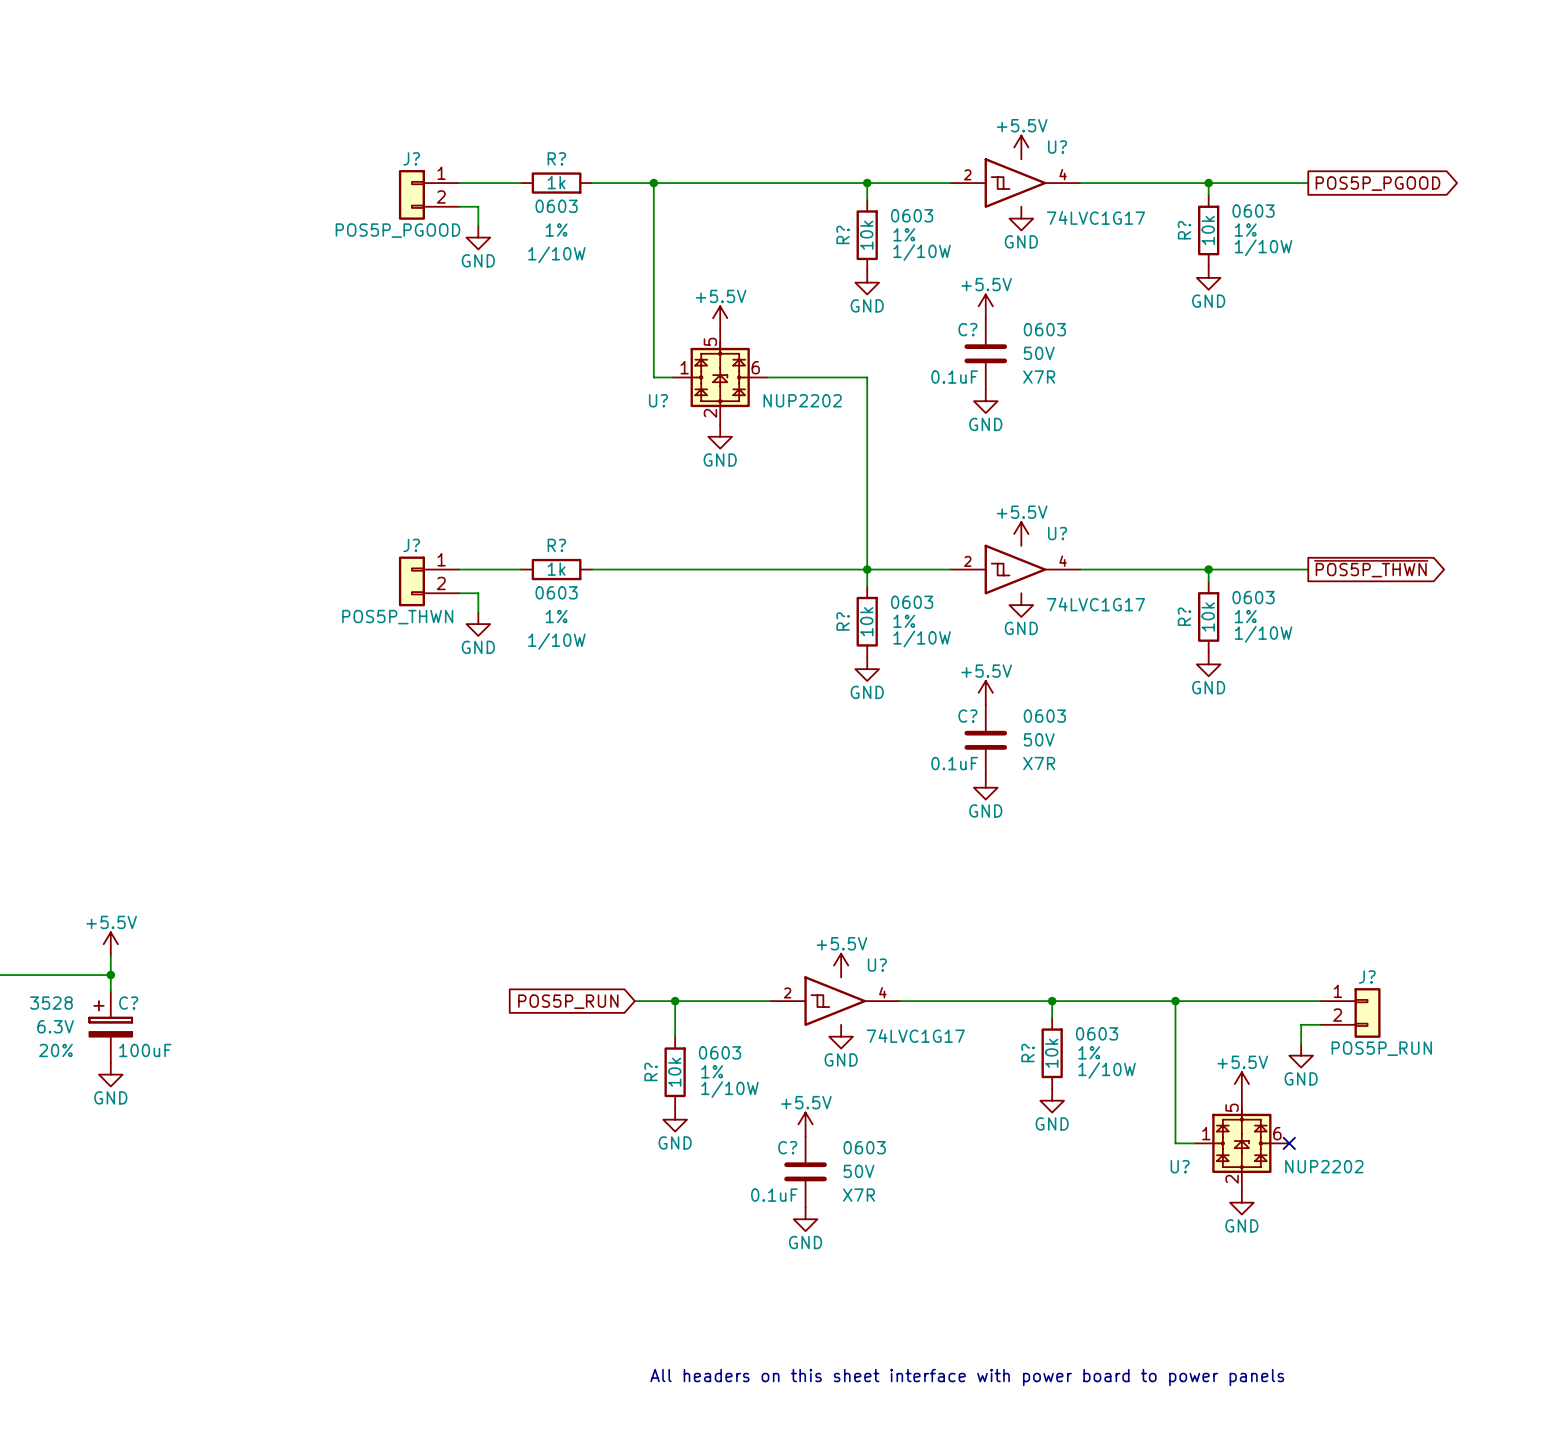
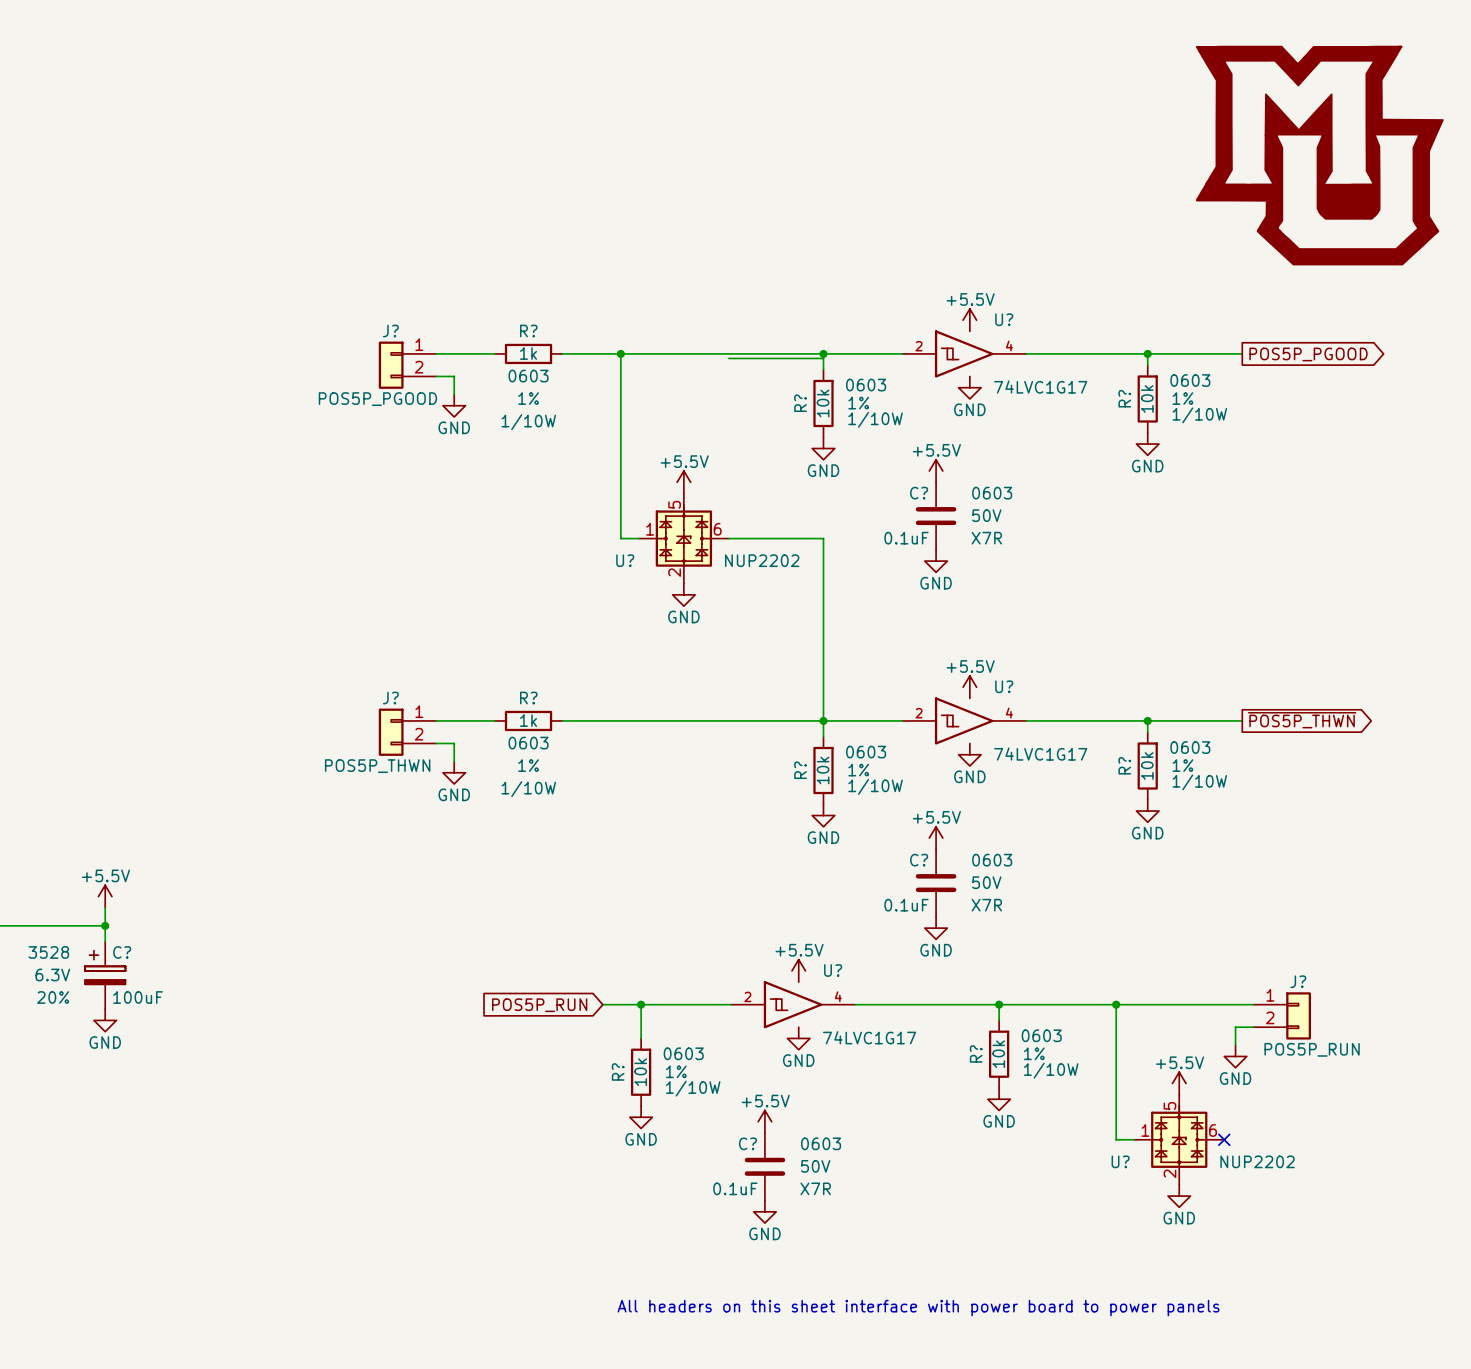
drawing: none -> [1196, 46, 1444, 265]
power symbol: +5.5V (1021, 147) -> none
wire: (459, 183) (521, 183) -> (436, 353) (494, 353)
R?: 1k (556, 183) -> none
wire: (592, 183) (950, 183) -> (562, 353) (902, 353)
wire: (653, 183) (653, 372) -> none
junction: (653, 183) -> none
wire: (867, 183) (867, 199) -> none
junction: (867, 183) -> none
U?: 74LVC1G17 (1015, 183) -> none
wire: (1080, 183) (1308, 183) -> (1026, 353) (1242, 353)
wire: (1208, 183) (1208, 194) -> (1147, 353) (1147, 365)
junction: (1208, 183) -> none
global label position: POS5P_PGOOD (1378, 183) -> POS5P_PGOOD (1308, 354)
J? position: (429, 194) -> (407, 365)
wire: (459, 206) (478, 206) (478, 225) -> (436, 376) (454, 376) (454, 394)
power symbol: GND (1021, 218) -> none
R?: 10k (1208, 230) -> none
R?: 10k (867, 235) -> none
power symbol: GND (478, 237) -> none
power symbol: GND (1208, 277) -> none
power symbol: GND (867, 282) -> none
power symbol position: +5.5V (985, 306) -> +5.5V (969, 320)
power symbol: +5.5V (720, 318) -> none
C?: 0.1uF (985, 353) -> none
R?: none -> 1k (528, 353)
junction: none -> (620, 353)
junction: none -> (823, 353)
U?: none -> 74LVC1G17 (964, 353)
junction: none -> (1147, 353)
wire: (653, 377) (672, 377) -> (620, 358) (620, 538) (638, 538)
U? position: (720, 377) -> (683, 538)
wire: (867, 389) (867, 567) -> (728, 538) (823, 538)
power symbol position: GND (985, 401) -> GND (969, 387)
R?: none -> 10k (1147, 398)
R?: none -> 10k (823, 403)
power symbol: none -> GND (454, 405)
power symbol: GND (720, 436) -> none
power symbol: none -> GND (1147, 444)
power symbol: none -> GND (823, 448)
power symbol: none -> +5.5V (683, 482)
power symbol position: +5.5V (1021, 533) -> +5.5V (936, 471)
C?: none -> 0.1uF (936, 516)
global label position: ~{POS5P_THWN} (1371, 568) -> ~{POS5P_THWN} (1302, 720)
wire: (459, 569) (521, 569) -> (436, 720) (494, 720)
R?: 1k (556, 569) -> none
wire: (592, 569) (950, 569) -> (562, 720) (902, 720)
junction: (867, 569) -> none
U?: 74LVC1G17 (1015, 569) -> none
wire: (1080, 569) (1308, 569) -> (1026, 720) (1242, 720)
wire: (1208, 569) (1208, 581) -> (1147, 720) (1147, 732)
junction: (1208, 569) -> none
J? position: (429, 581) -> (407, 732)
wire: none -> (823, 556) (823, 736)
wire: (459, 593) (478, 593) (478, 612) -> (436, 743) (454, 743) (454, 761)
power symbol position: GND (1021, 605) -> GND (936, 561)
R?: 10k (1208, 616) -> none
R?: 10k (867, 621) -> none
power symbol: GND (478, 624) -> none
power symbol: none -> GND (683, 594)
power symbol: GND (1208, 664) -> none
power symbol: GND (867, 669) -> none
power symbol position: +5.5V (985, 692) -> +5.5V (969, 687)
C?: 0.1uF (985, 740) -> none
R?: none -> 1k (528, 720)
junction: none -> (823, 720)
U?: none -> 74LVC1G17 (964, 720)
junction: none -> (1147, 720)
power symbol position: GND (985, 787) -> GND (969, 754)
R?: none -> 10k (1147, 766)
R?: none -> 10k (823, 770)
power symbol: none -> GND (454, 772)
power symbol: none -> GND (1147, 811)
power symbol: none -> GND (823, 815)
power symbol: none -> +5.5V (936, 838)
C?: none -> 0.1uF (936, 883)
power symbol: +5.5V (841, 965) -> none
power symbol: none -> GND (936, 928)
global label position: POS5P_RUN (568, 1001) -> POS5P_RUN (539, 1005)
wire: (634, 1001) (769, 1001) -> (602, 1004) (731, 1004)
wire: (675, 1001) (675, 1036) -> (641, 1004) (641, 1038)
junction: (675, 1001) -> none
U? position: (835, 1001) -> (793, 1004)
wire: (900, 1001) (1320, 1001) -> (855, 1004) (1253, 1004)
wire: (1052, 1001) (1052, 1017) -> (999, 1004) (999, 1020)
junction: (1052, 1001) -> none
wire: (1175, 1001) (1175, 1058) -> none
junction: (1175, 1001) -> none
J? position: (1350, 1012) -> (1282, 1015)
power symbol: none -> +5.5V (798, 970)
wire: (1320, 1024) (1301, 1024) (1301, 1043) -> (1253, 1027) (1235, 1027) (1235, 1045)
power symbol position: GND (841, 1036) -> GND (798, 1038)
R? position: (1052, 1053) -> (999, 1054)
power symbol: GND (1301, 1055) -> none
junction: none -> (641, 1004)
junction: none -> (999, 1004)
junction: none -> (1116, 1004)
R? position: (675, 1072) -> (641, 1072)
power symbol position: +5.5V (1241, 1084) -> +5.5V (1179, 1083)
power symbol position: GND (1052, 1100) -> GND (999, 1099)
power symbol: none -> GND (1235, 1056)
power symbol position: GND (675, 1119) -> GND (641, 1117)
power symbol: +5.5V (805, 1124) -> none
wire: (1175, 1143) (1194, 1143) -> (1116, 1085) (1116, 1139) (1134, 1139)
U? position: (1241, 1143) -> (1179, 1139)
no-connect mark: (1289, 1143) -> none
C? position: (805, 1171) -> (764, 1166)
power symbol: none -> +5.5V (764, 1121)
no-connect mark: none -> (1224, 1139)
power symbol: GND (1241, 1202) -> none
power symbol position: GND (805, 1219) -> GND (764, 1211)
power symbol: none -> GND (1179, 1196)

